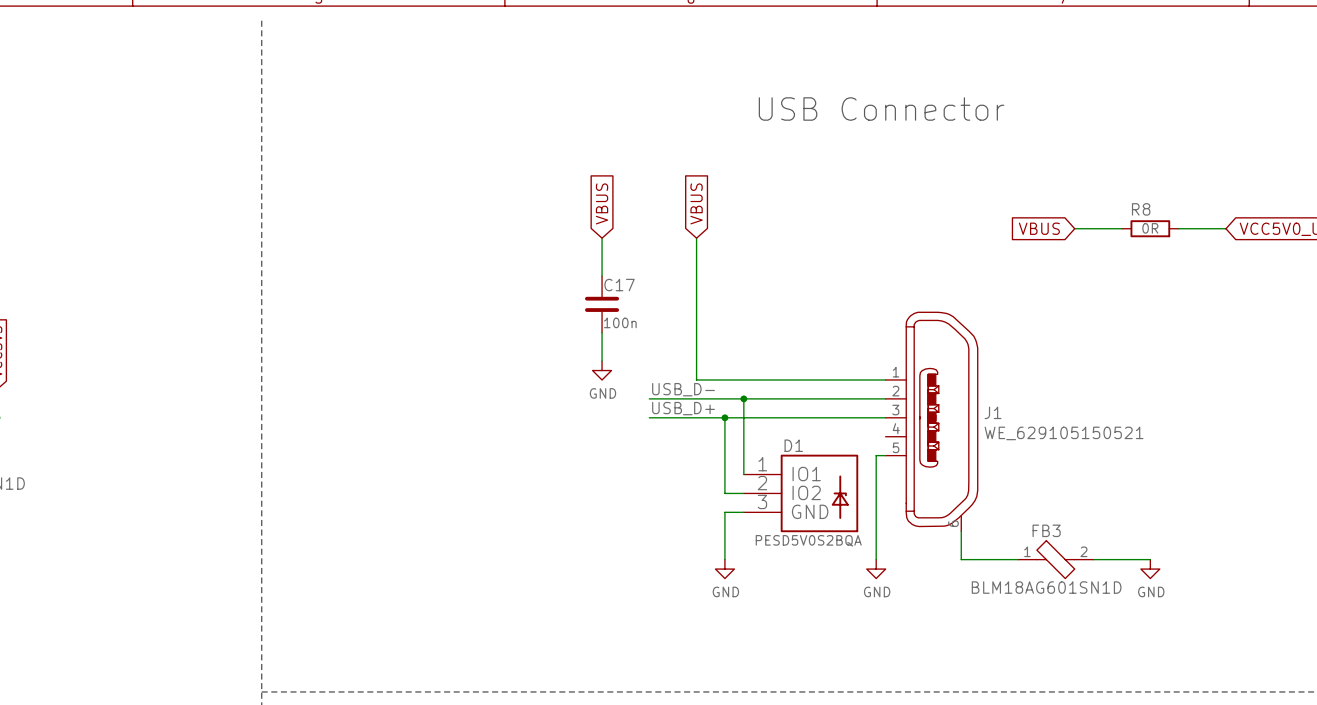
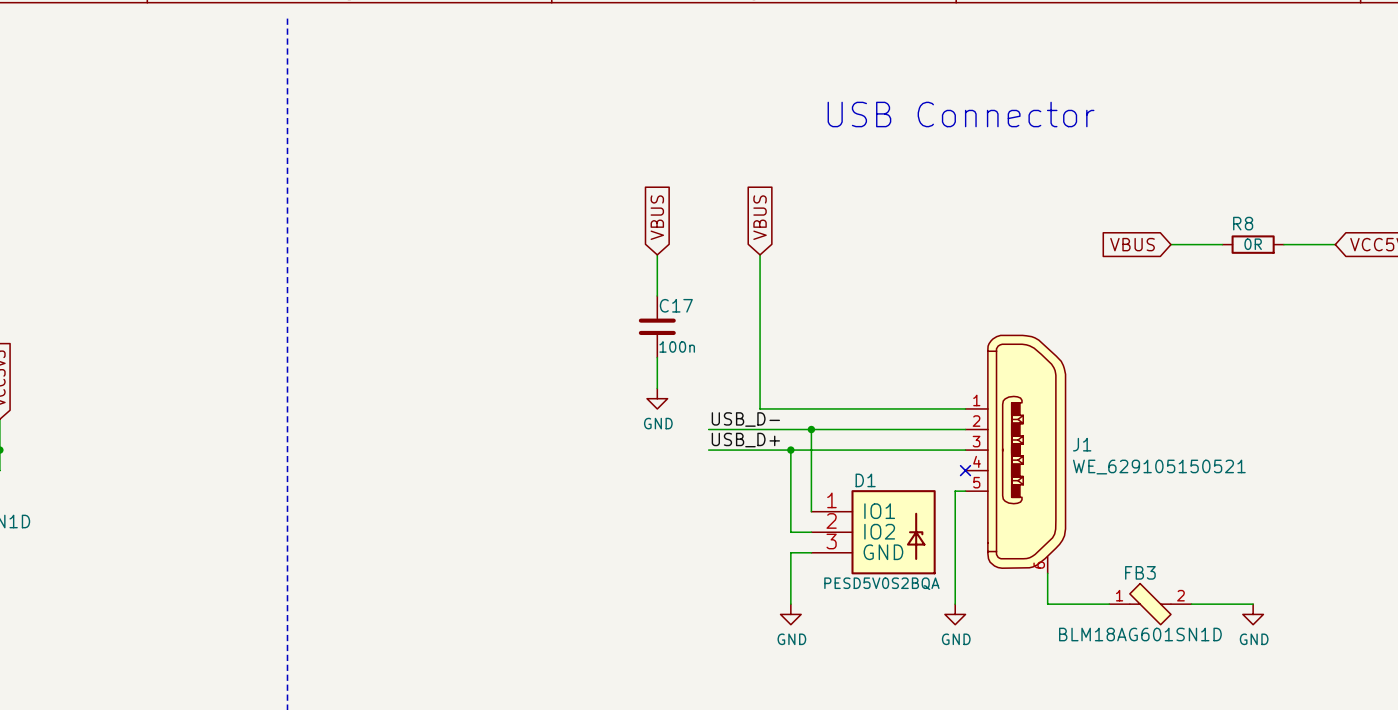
no-connect mark: none -> (965, 470)

